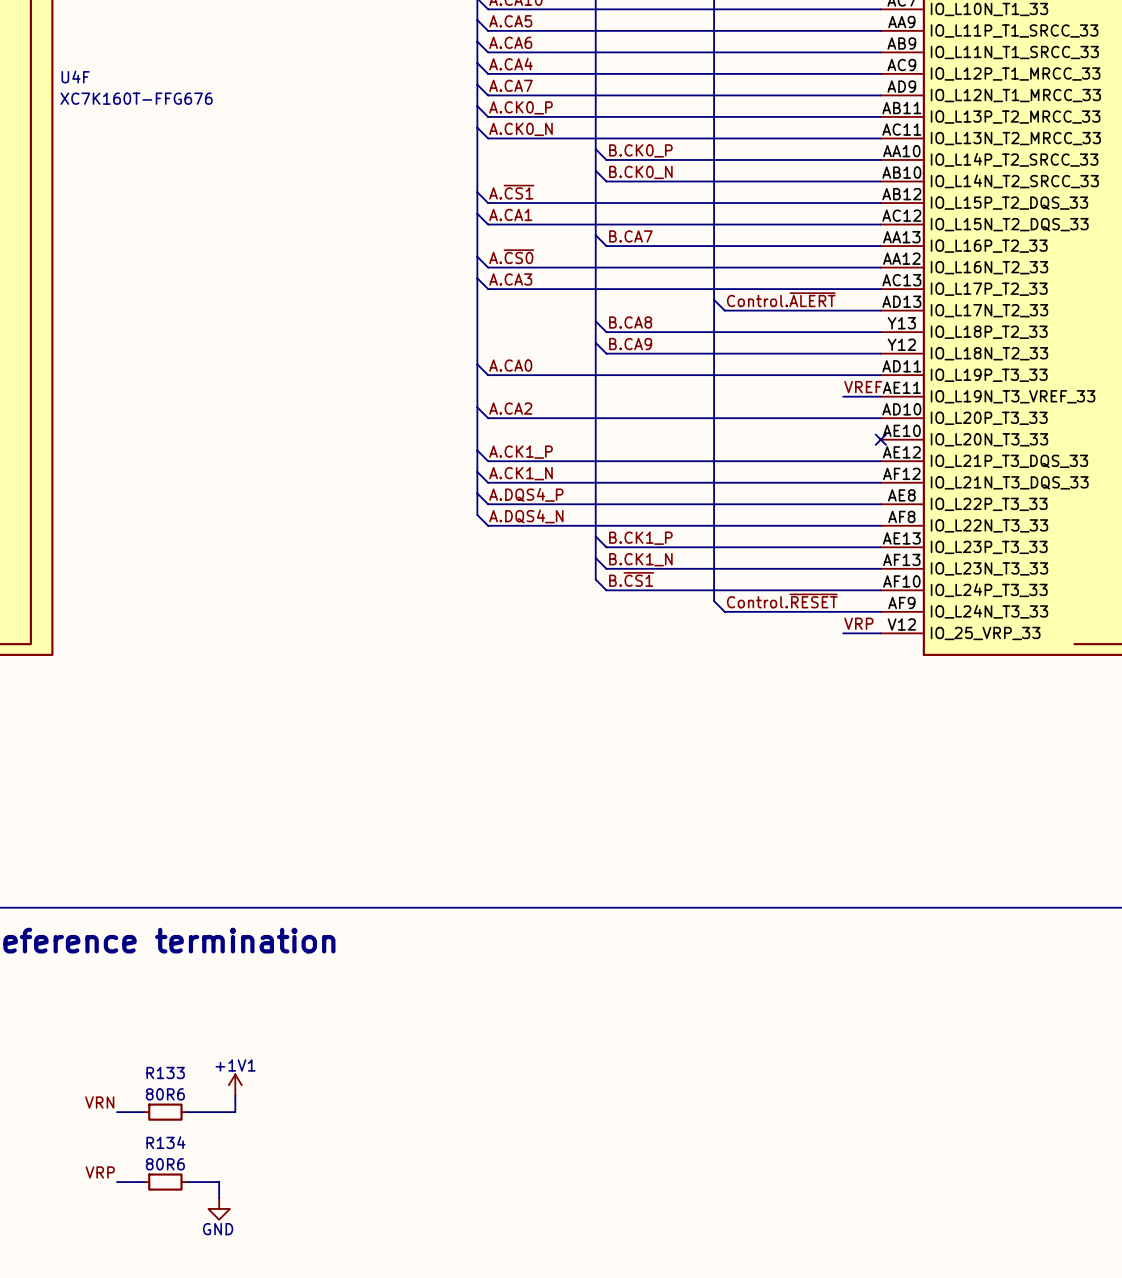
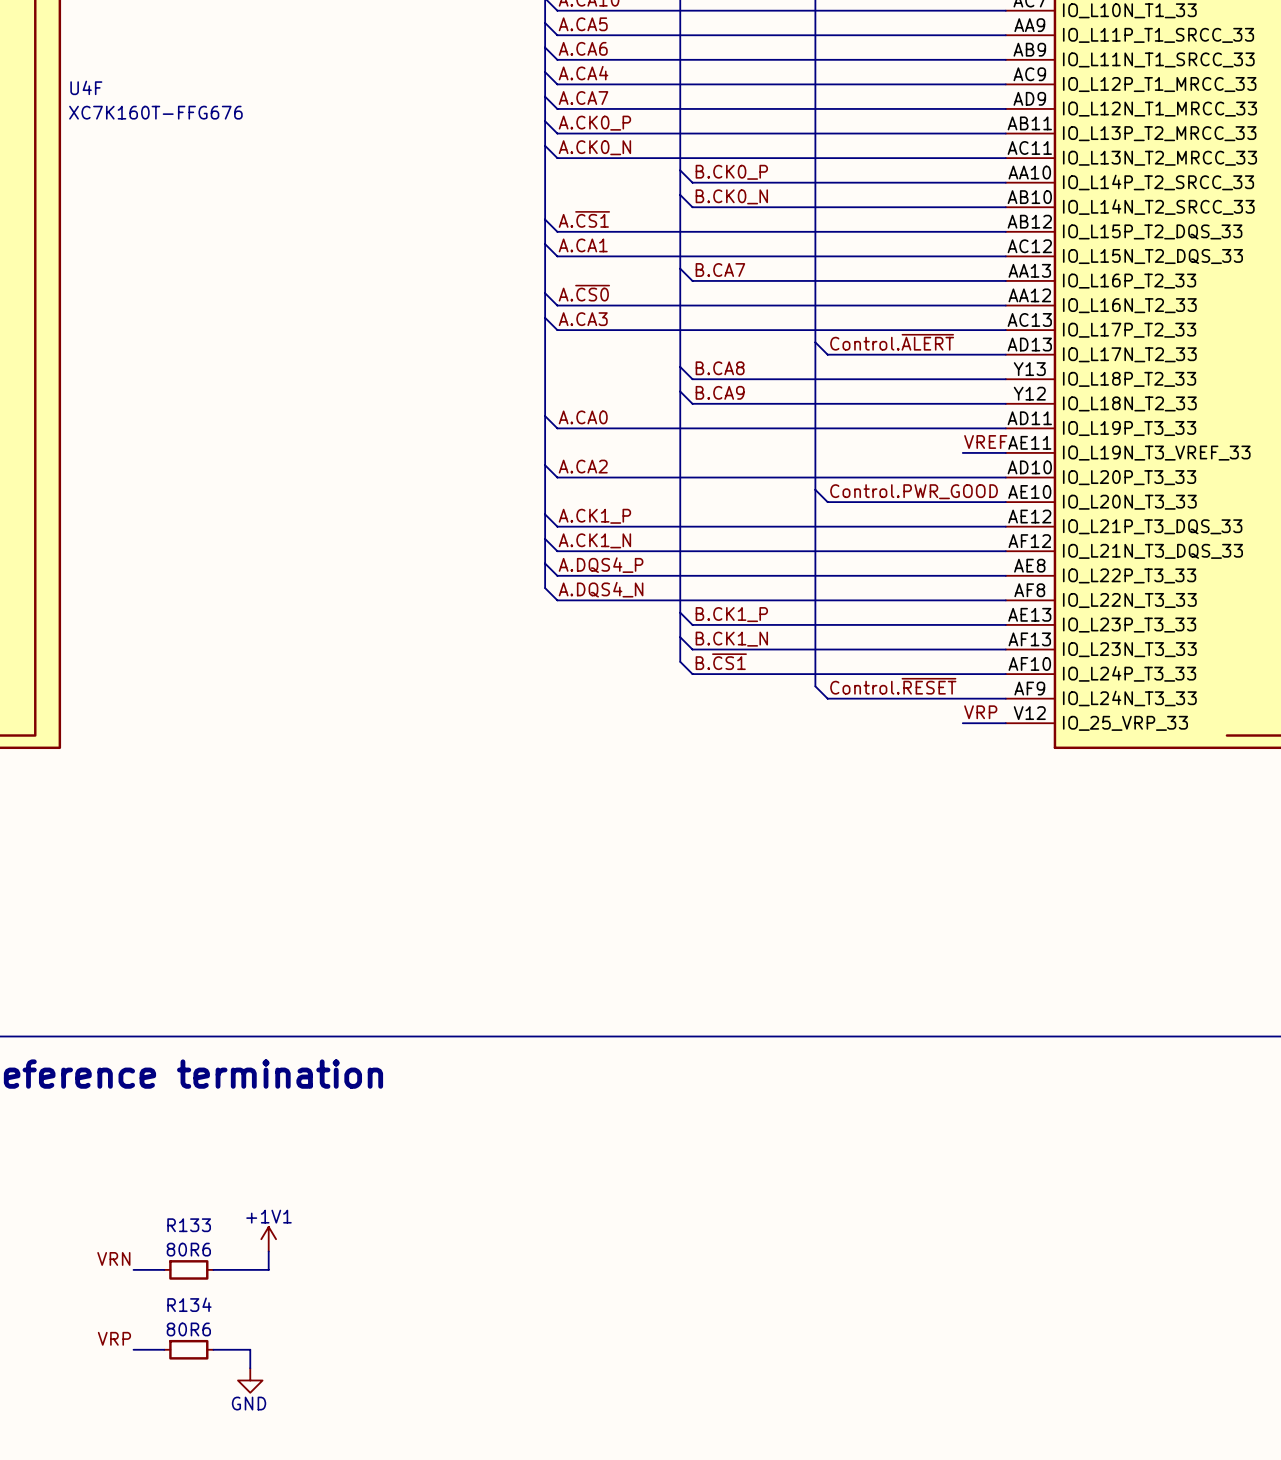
wire: none -> (815, 489) (827, 502) (1005, 502)
label: none -> Control.PWR_GOOD (914, 491)
no-connect mark: (880, 439) -> none

